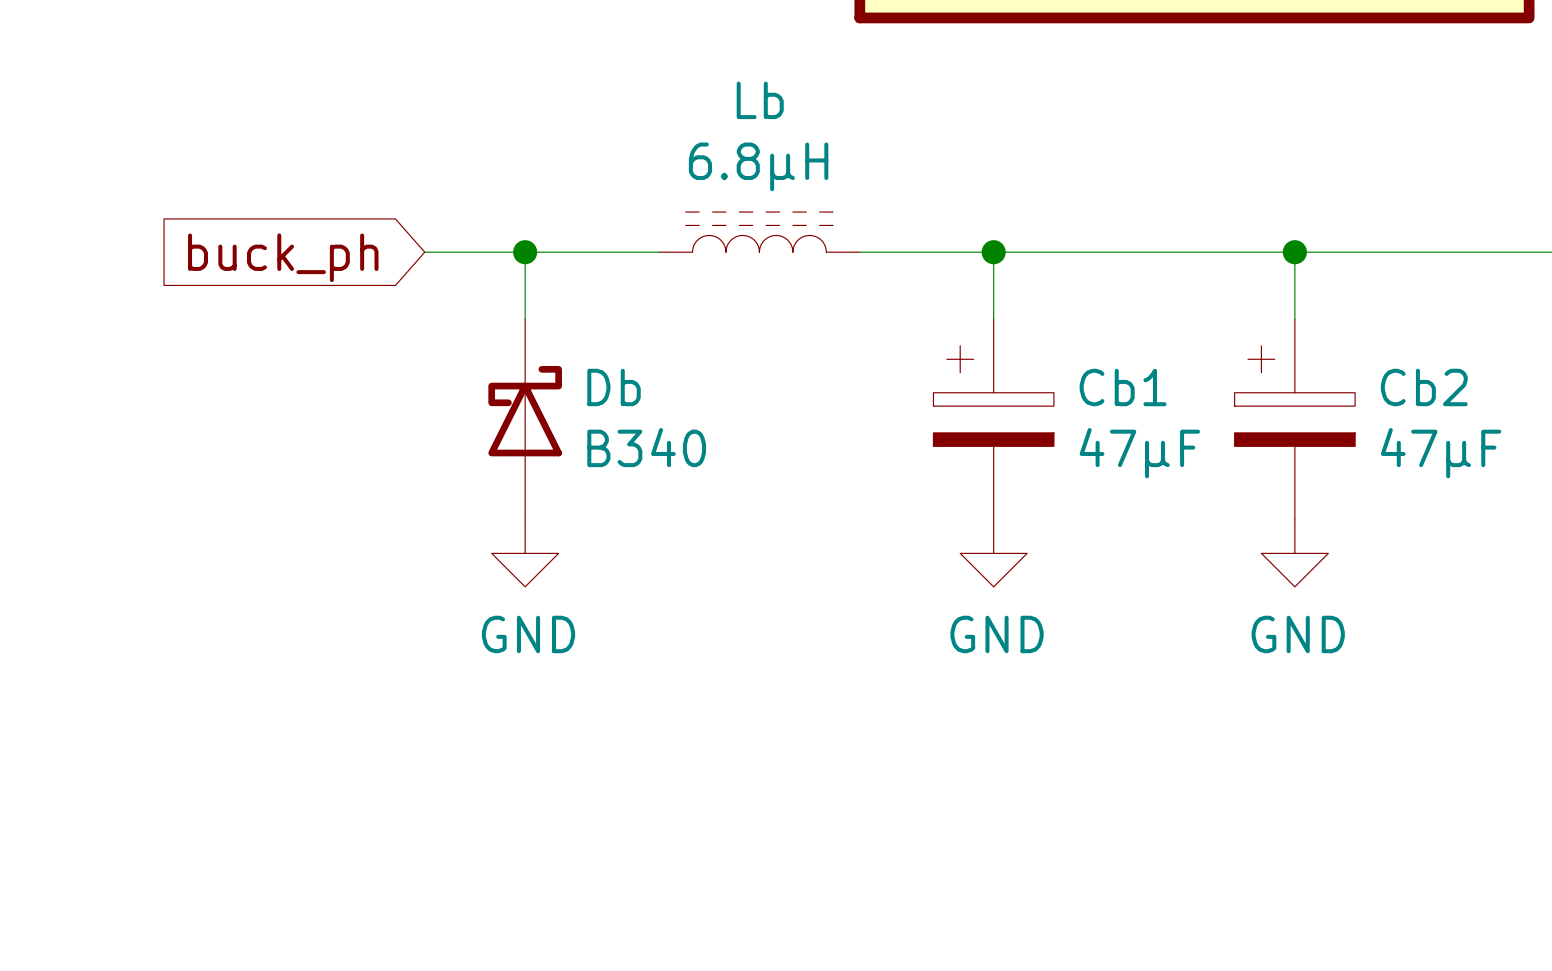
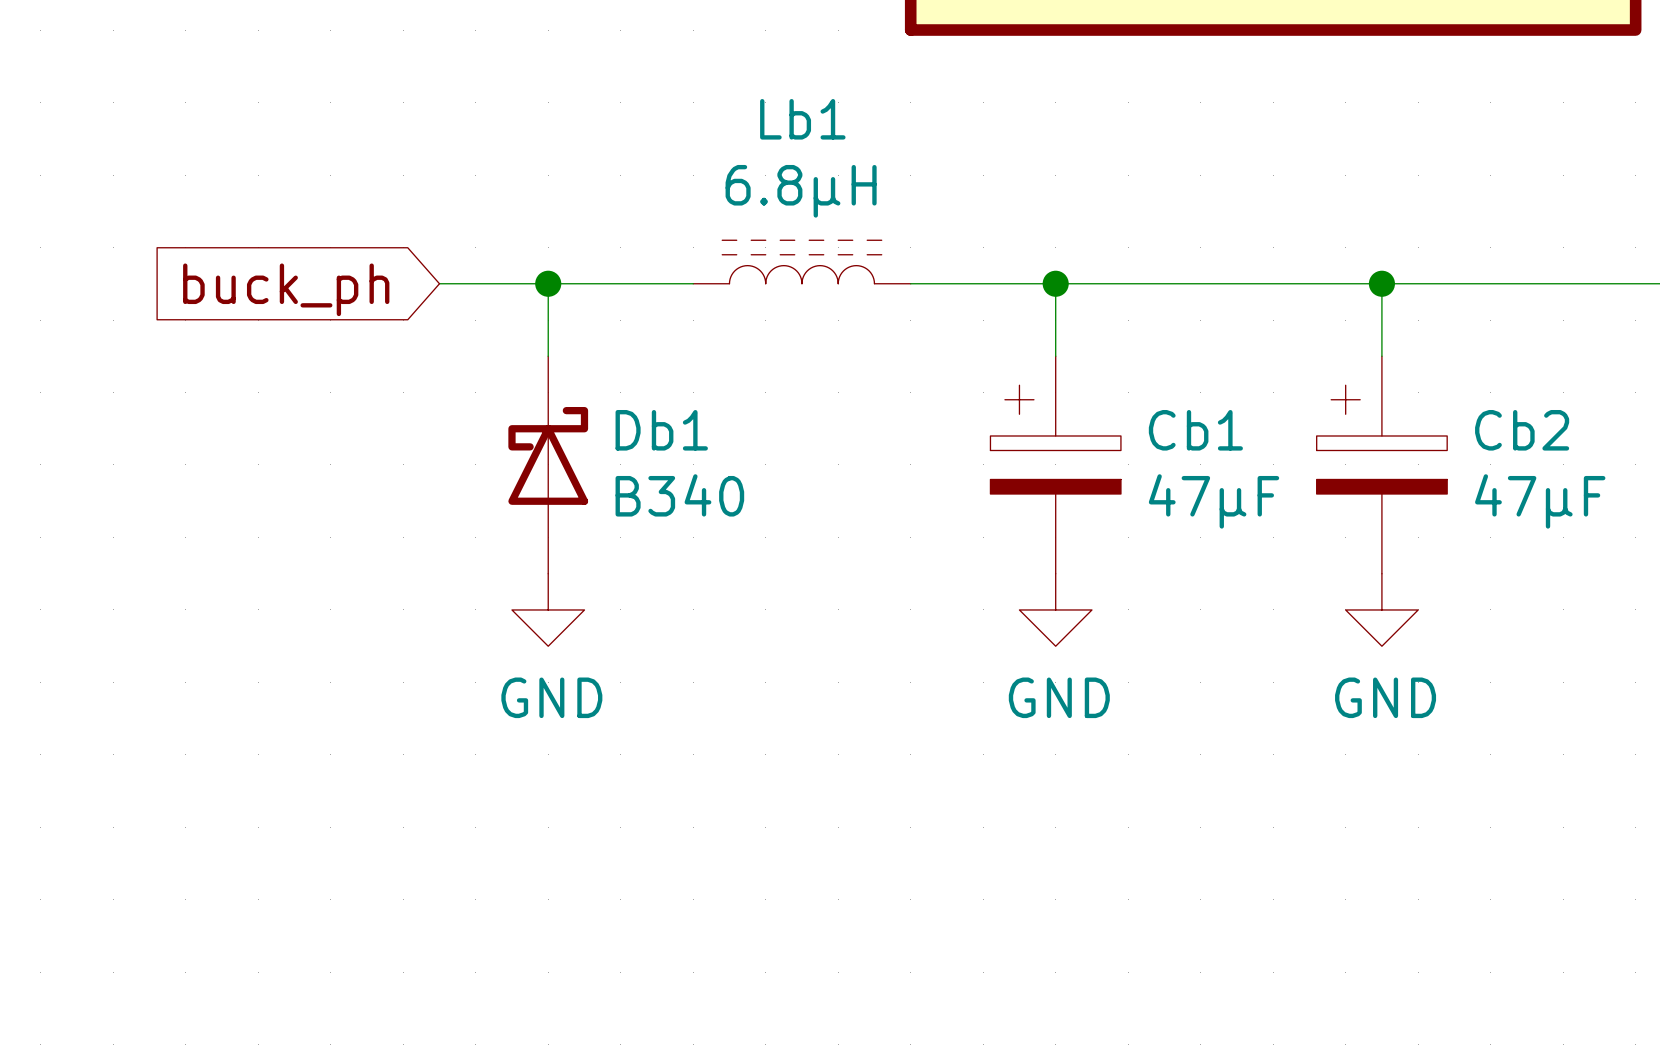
Lb name: Lb (760, 100) -> Lb1 (802, 119)
Db name: Db (614, 387) -> Db1 (661, 430)

